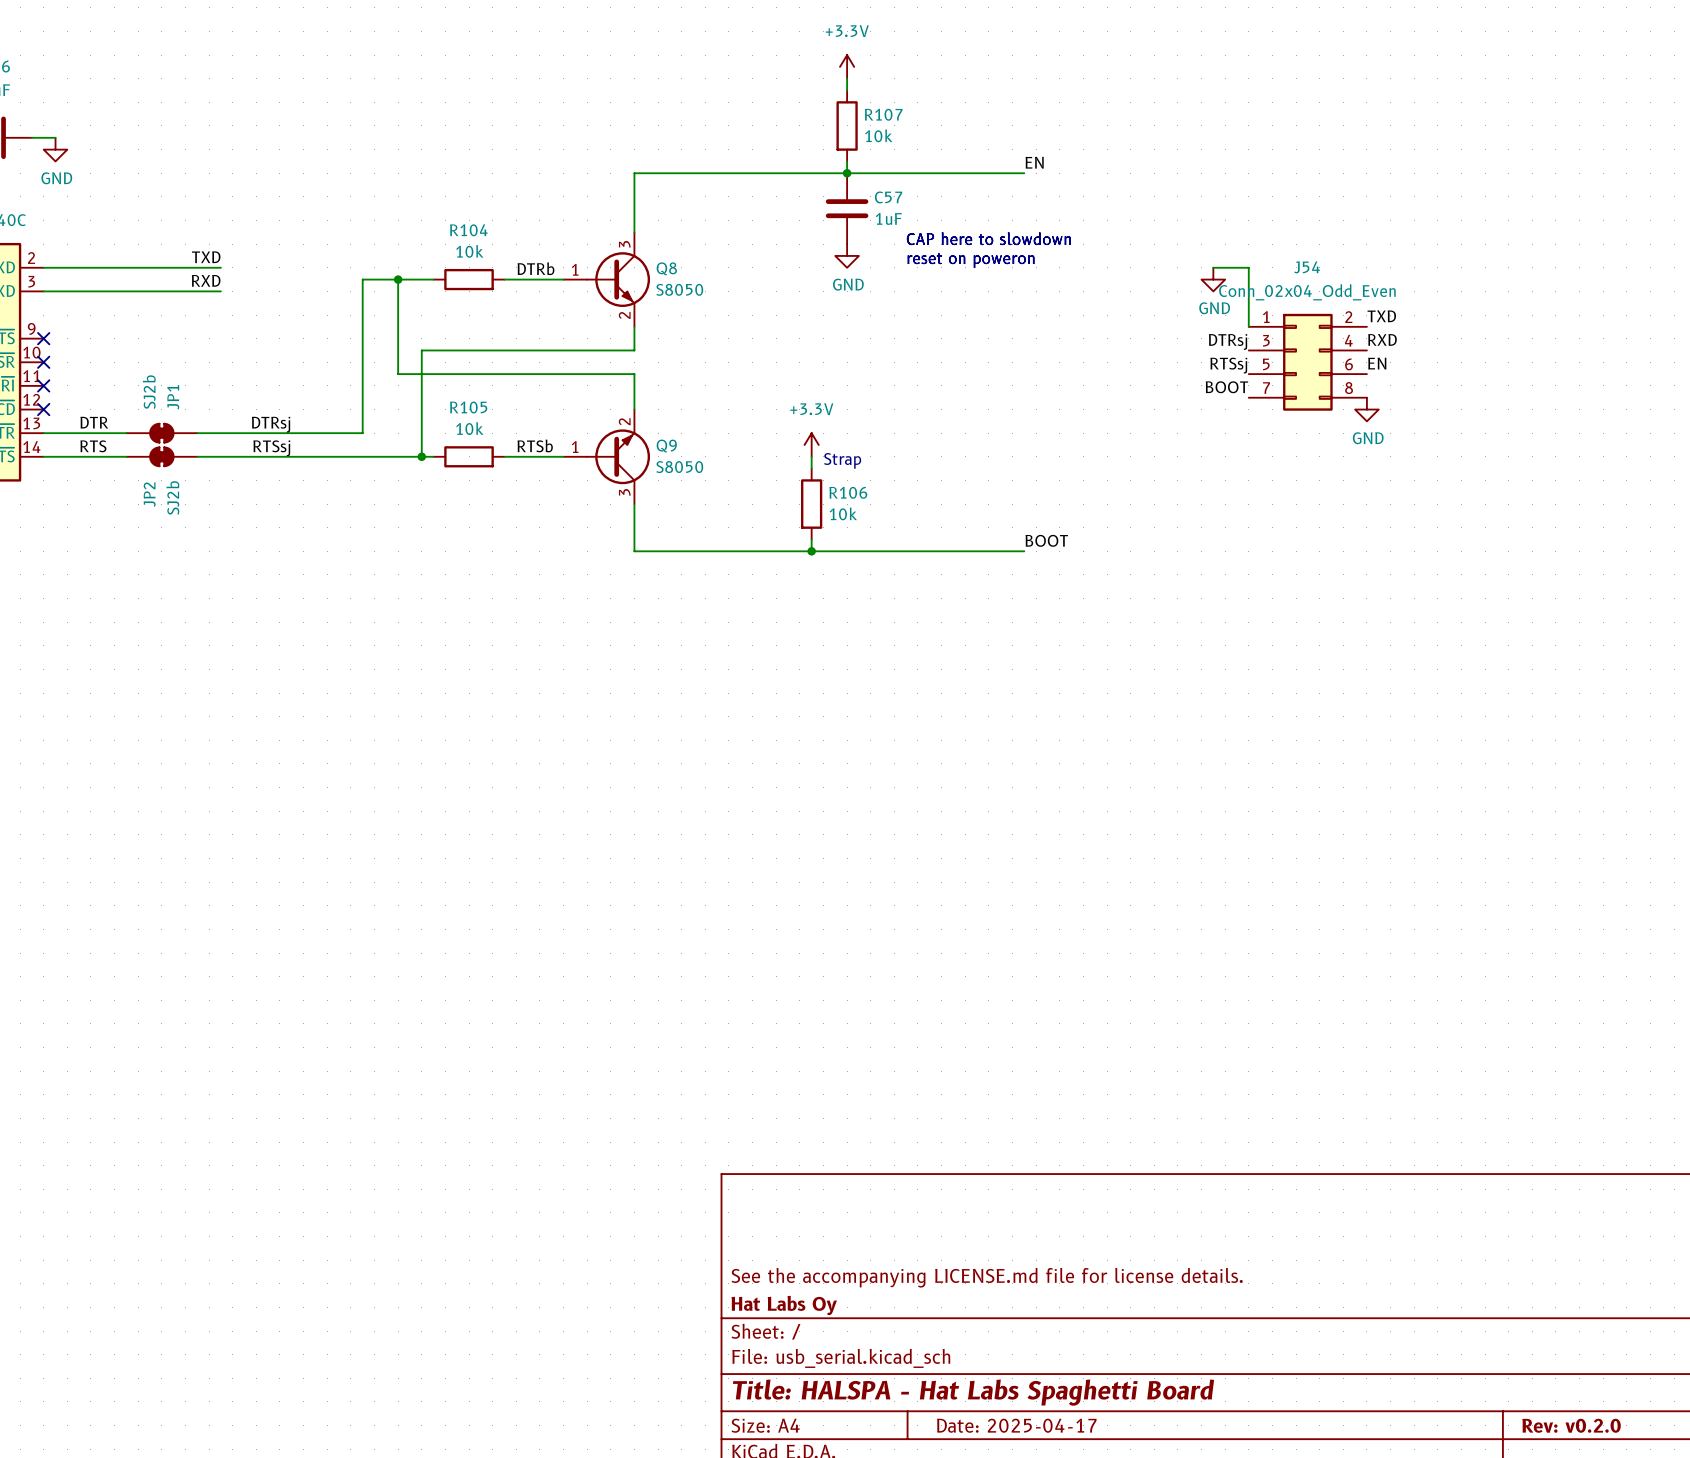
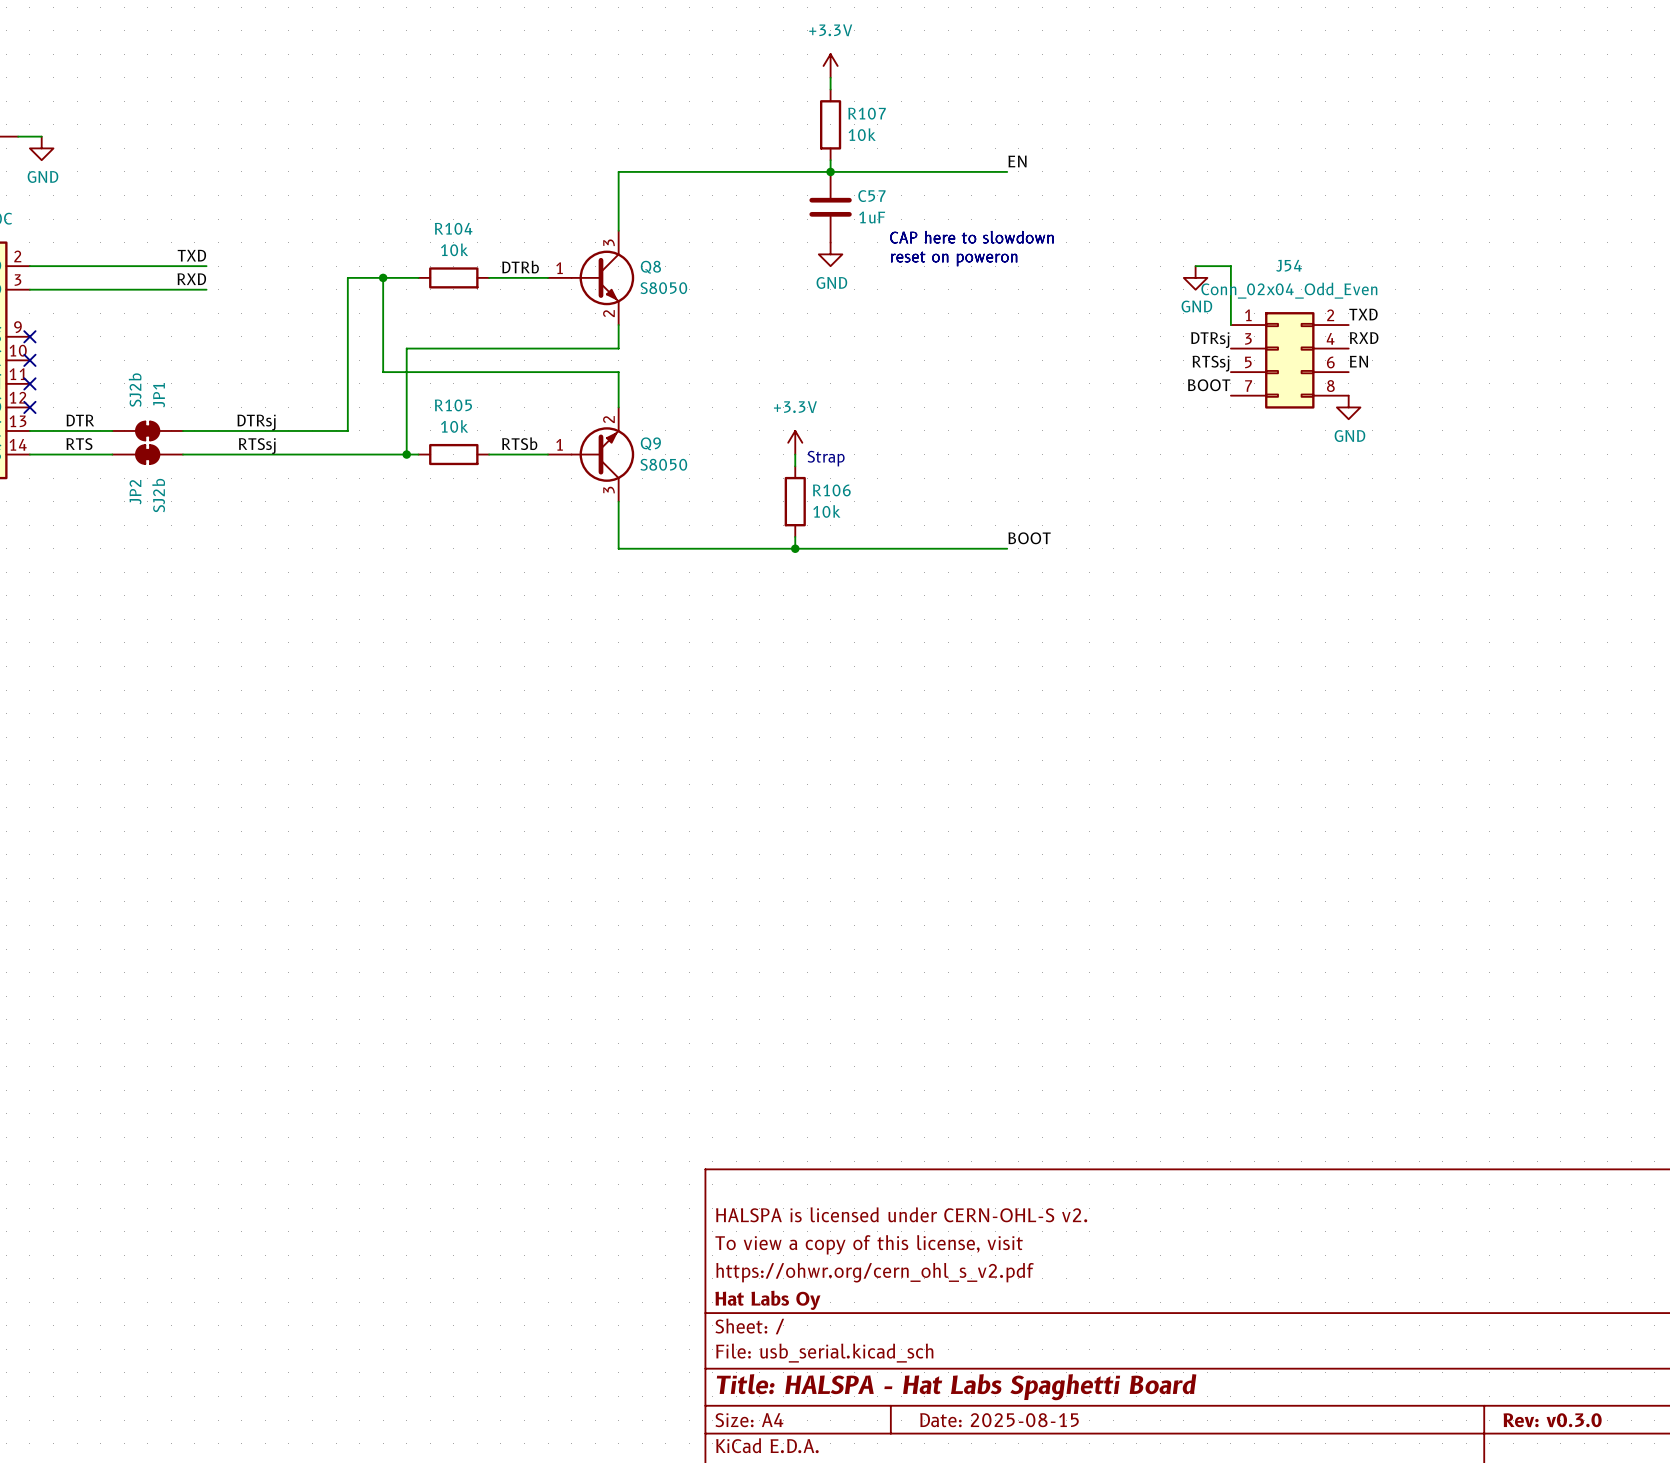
title block: none -> HALSPA is licensed under CERN-OHL-S v2. (901, 1214)
title block: none -> To view a copy of this license, visit (869, 1244)
title block: See the accompanying LICENSE.md file for license details. (987, 1277) -> https://ohwr.org/cern_ohl_s_v2.pdf (875, 1272)
title block: Date: 2025-04-17 (1016, 1425) -> Date: 2025-08-15 (999, 1420)
title block: Rev: v0.2.0 (1571, 1425) -> Rev: v0.3.0 (1552, 1420)

